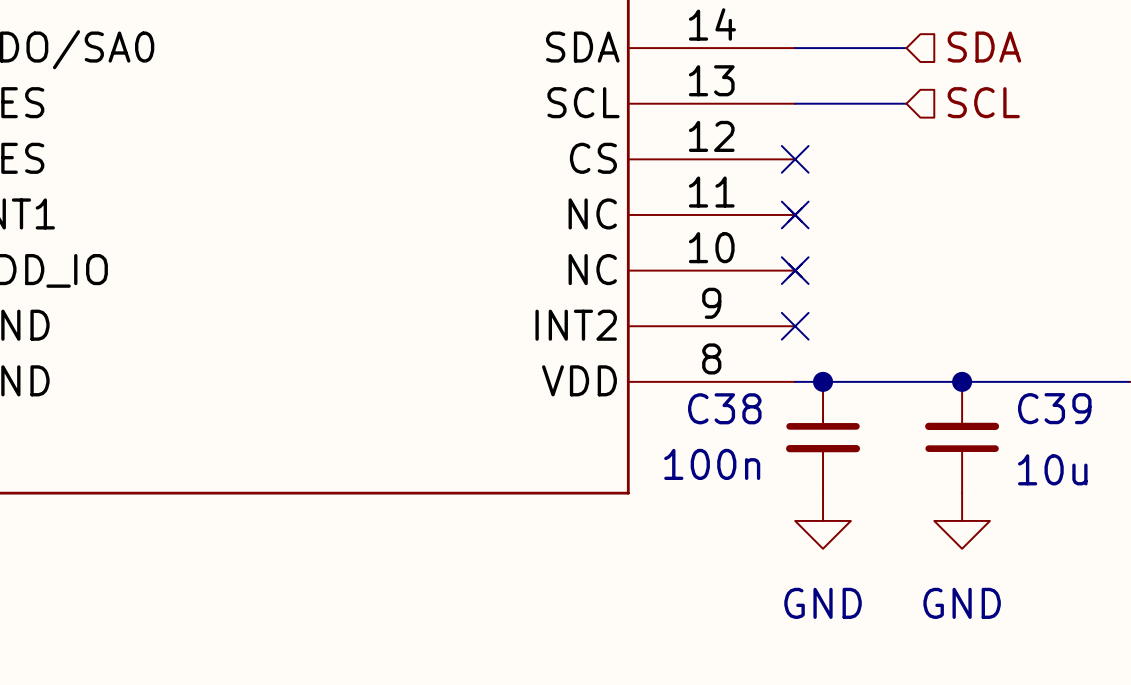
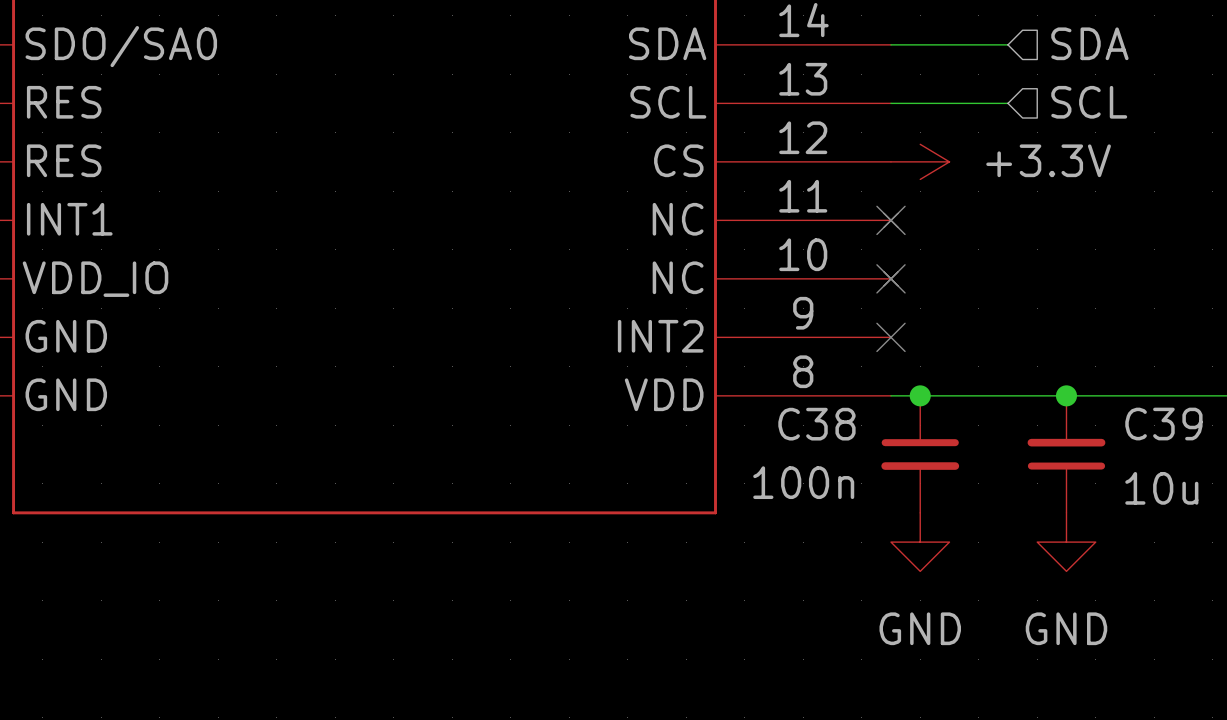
no-connect mark: (795, 159) -> none
power symbol: none -> +3.3V (920, 161)

